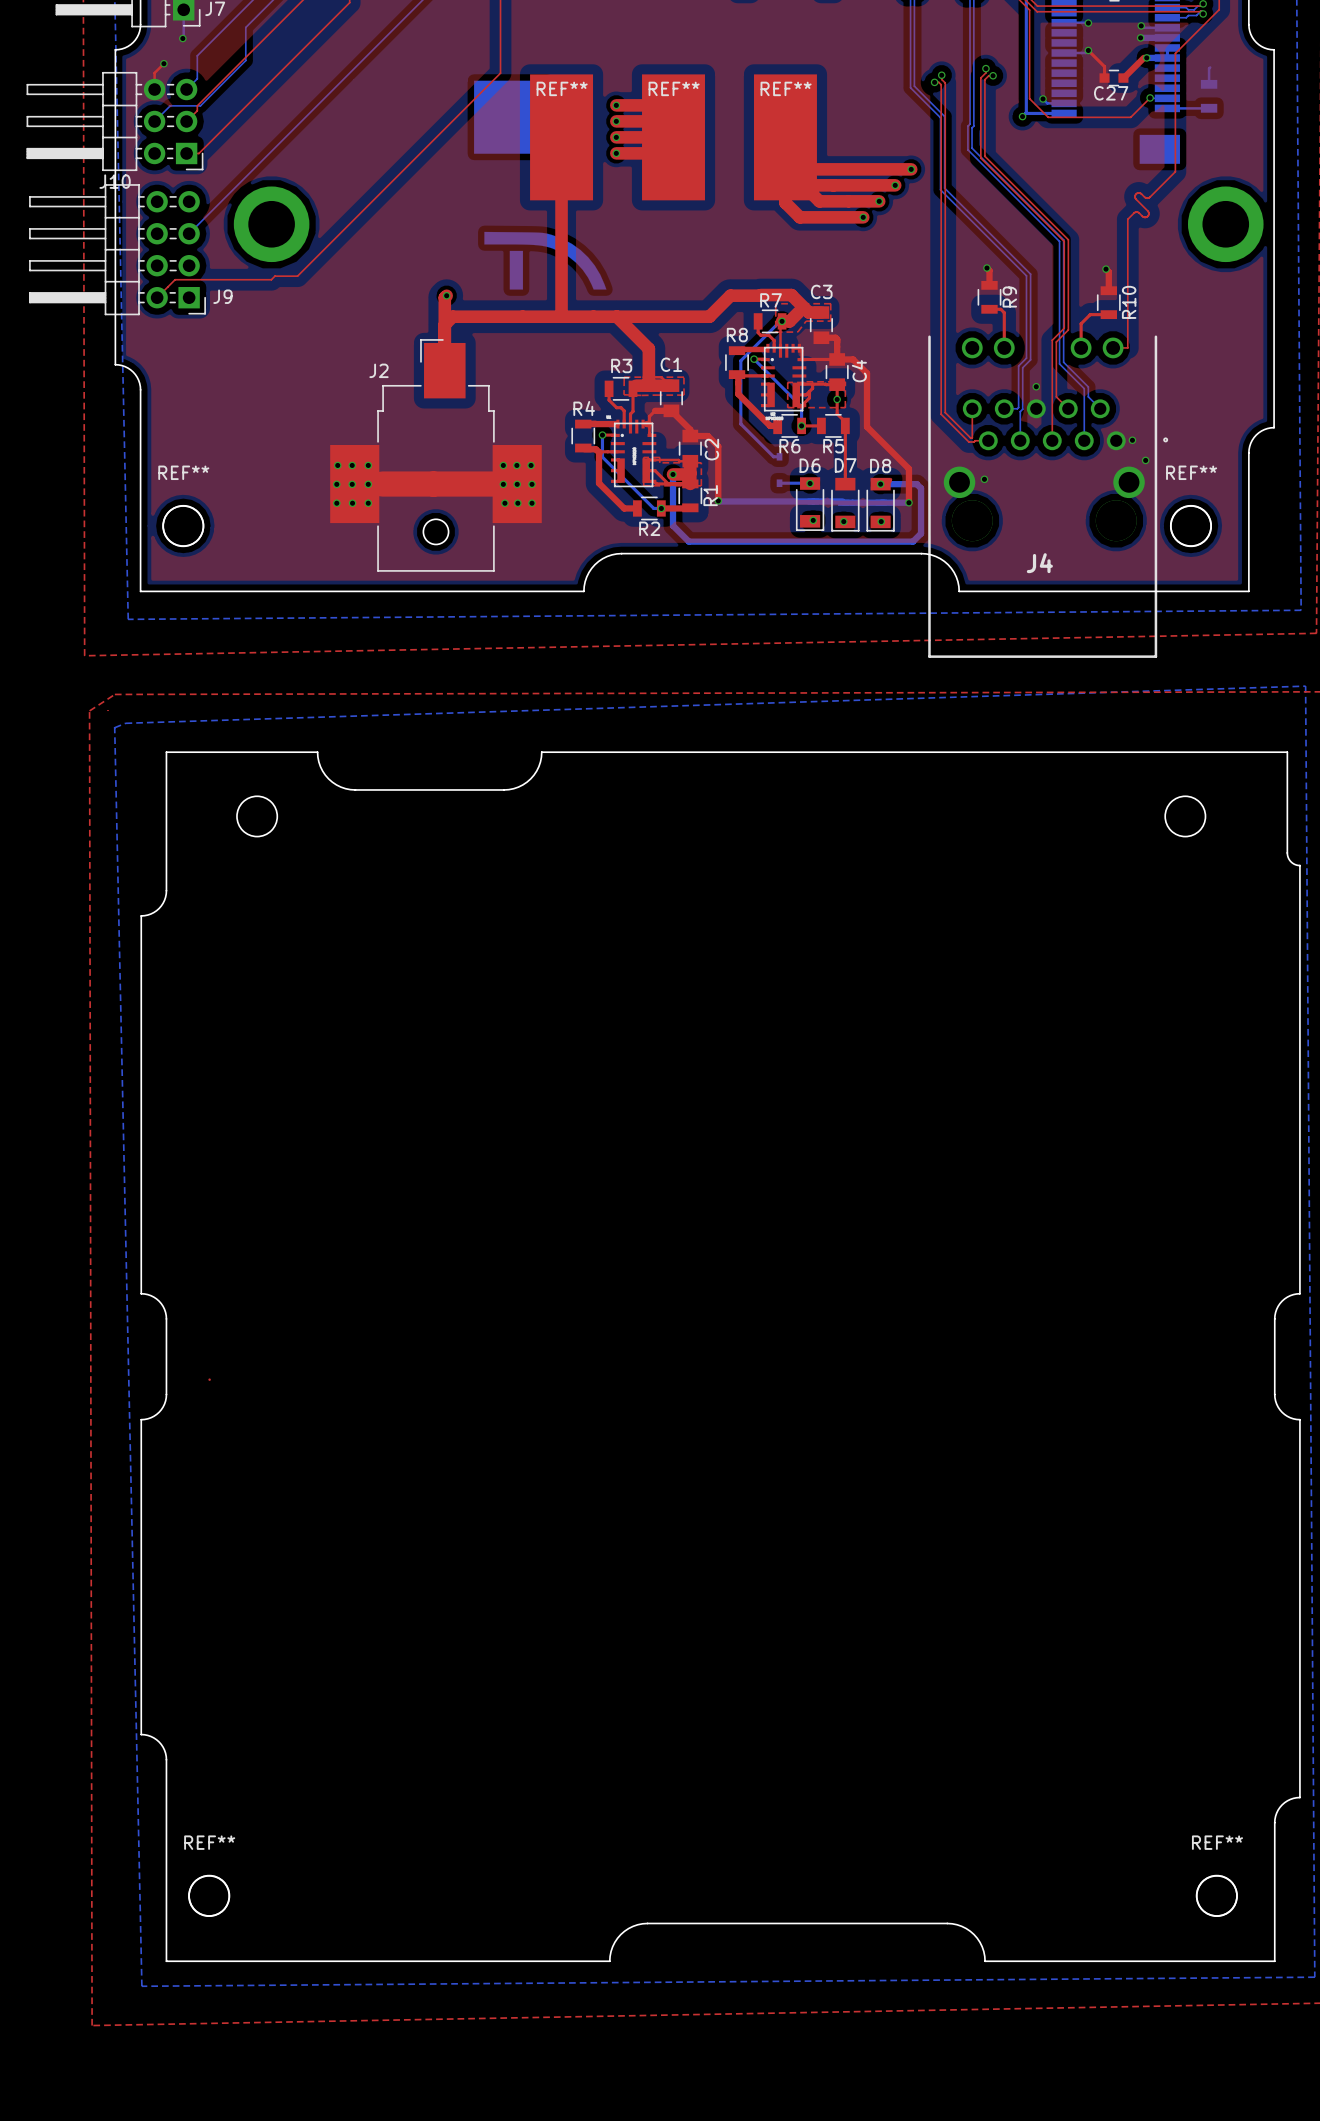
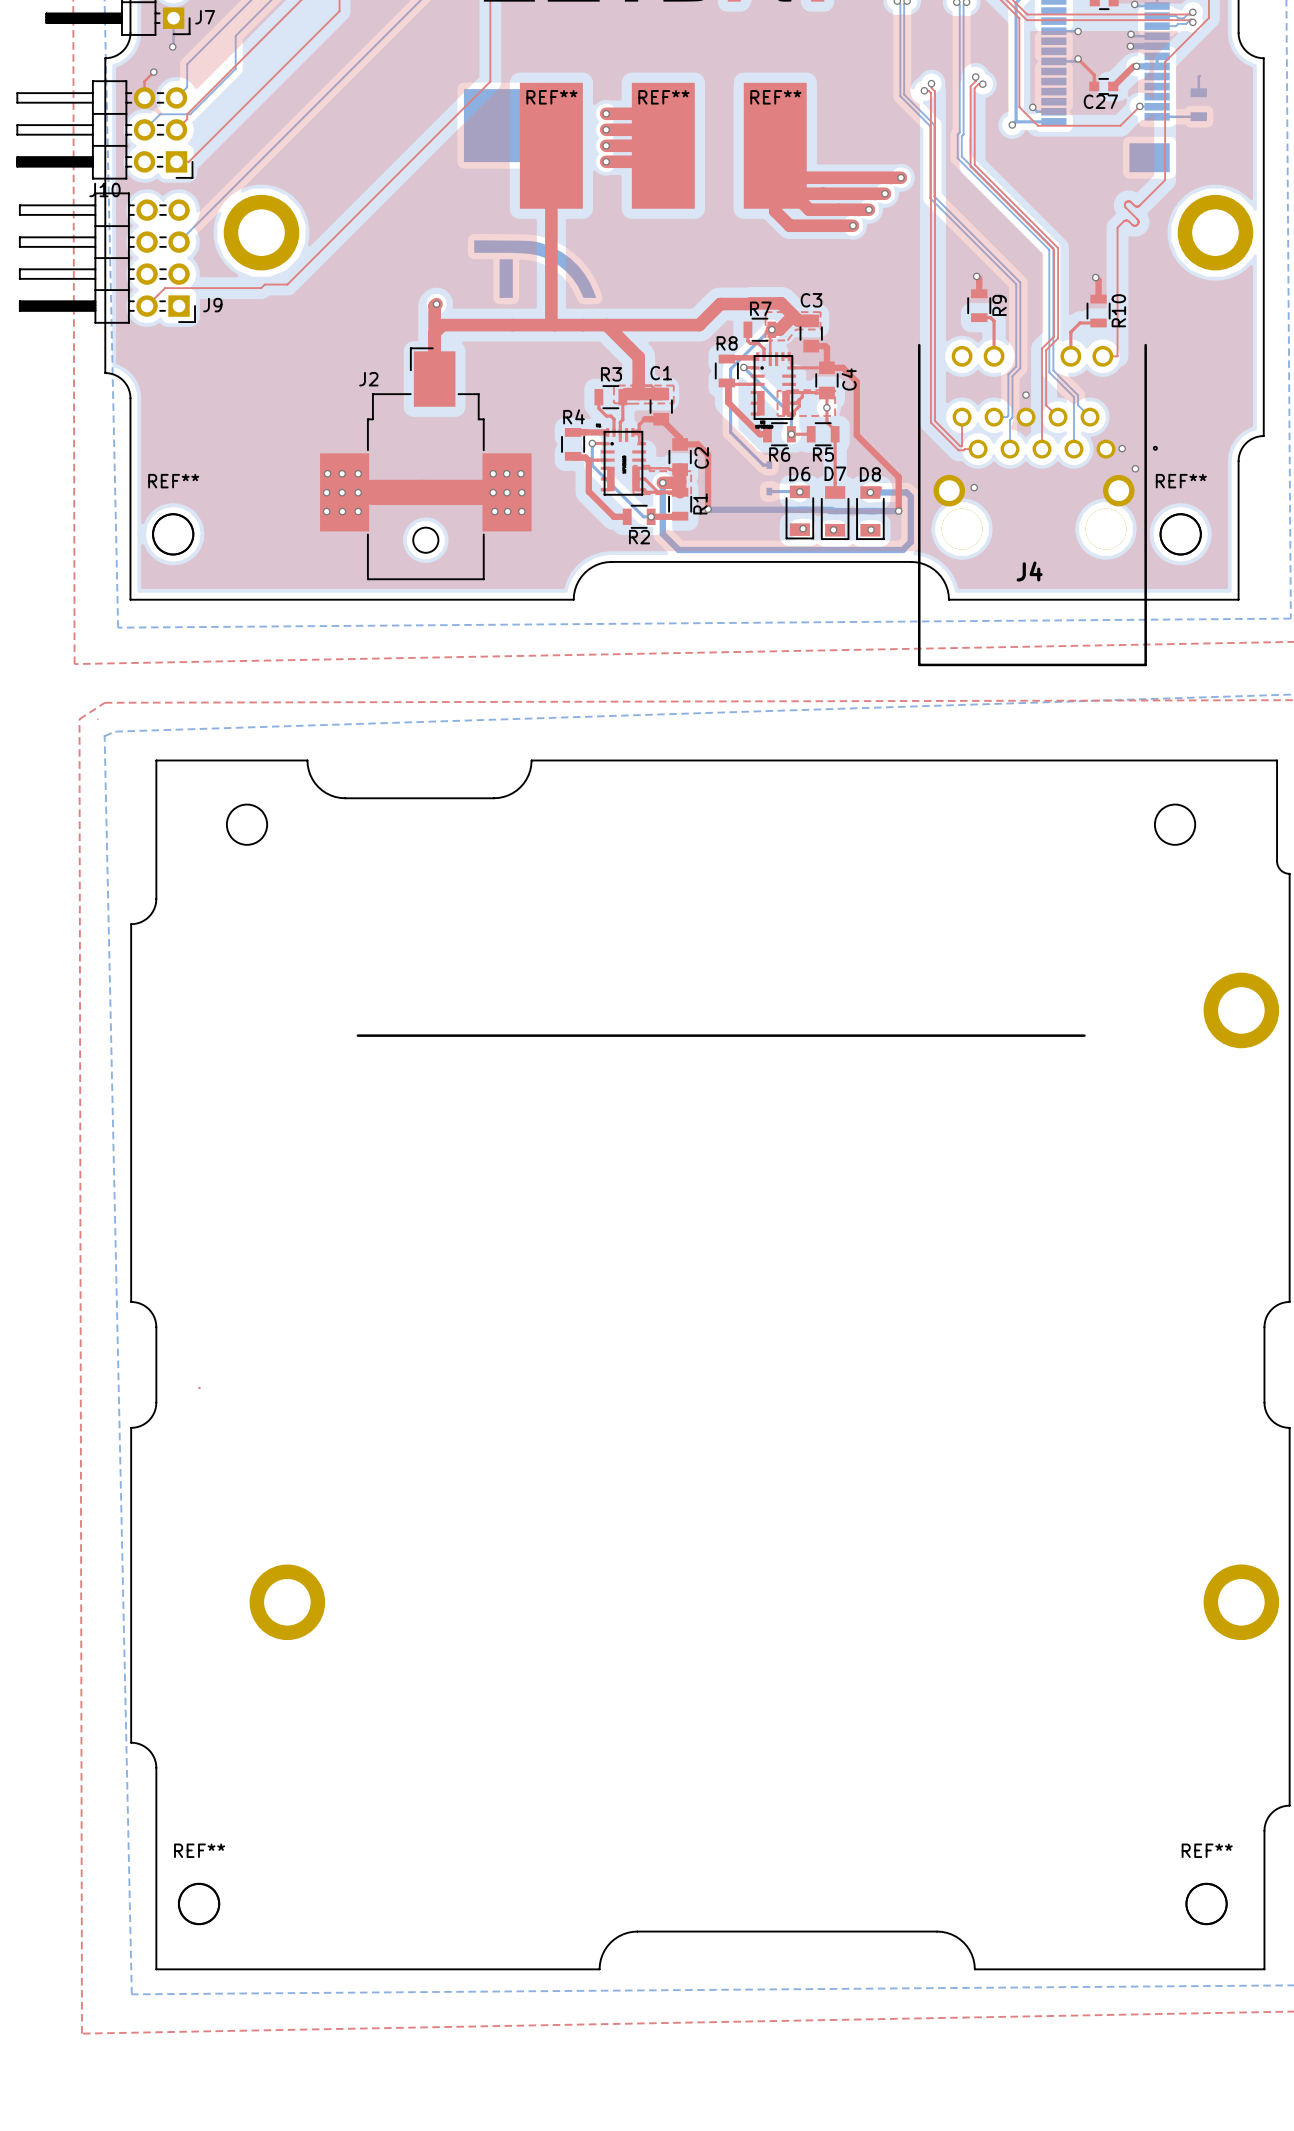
part: none -> (1241, 1010)
line: none -> (357, 1035) (1084, 1035)
part: none -> (287, 1602)
part: none -> (1241, 1602)

